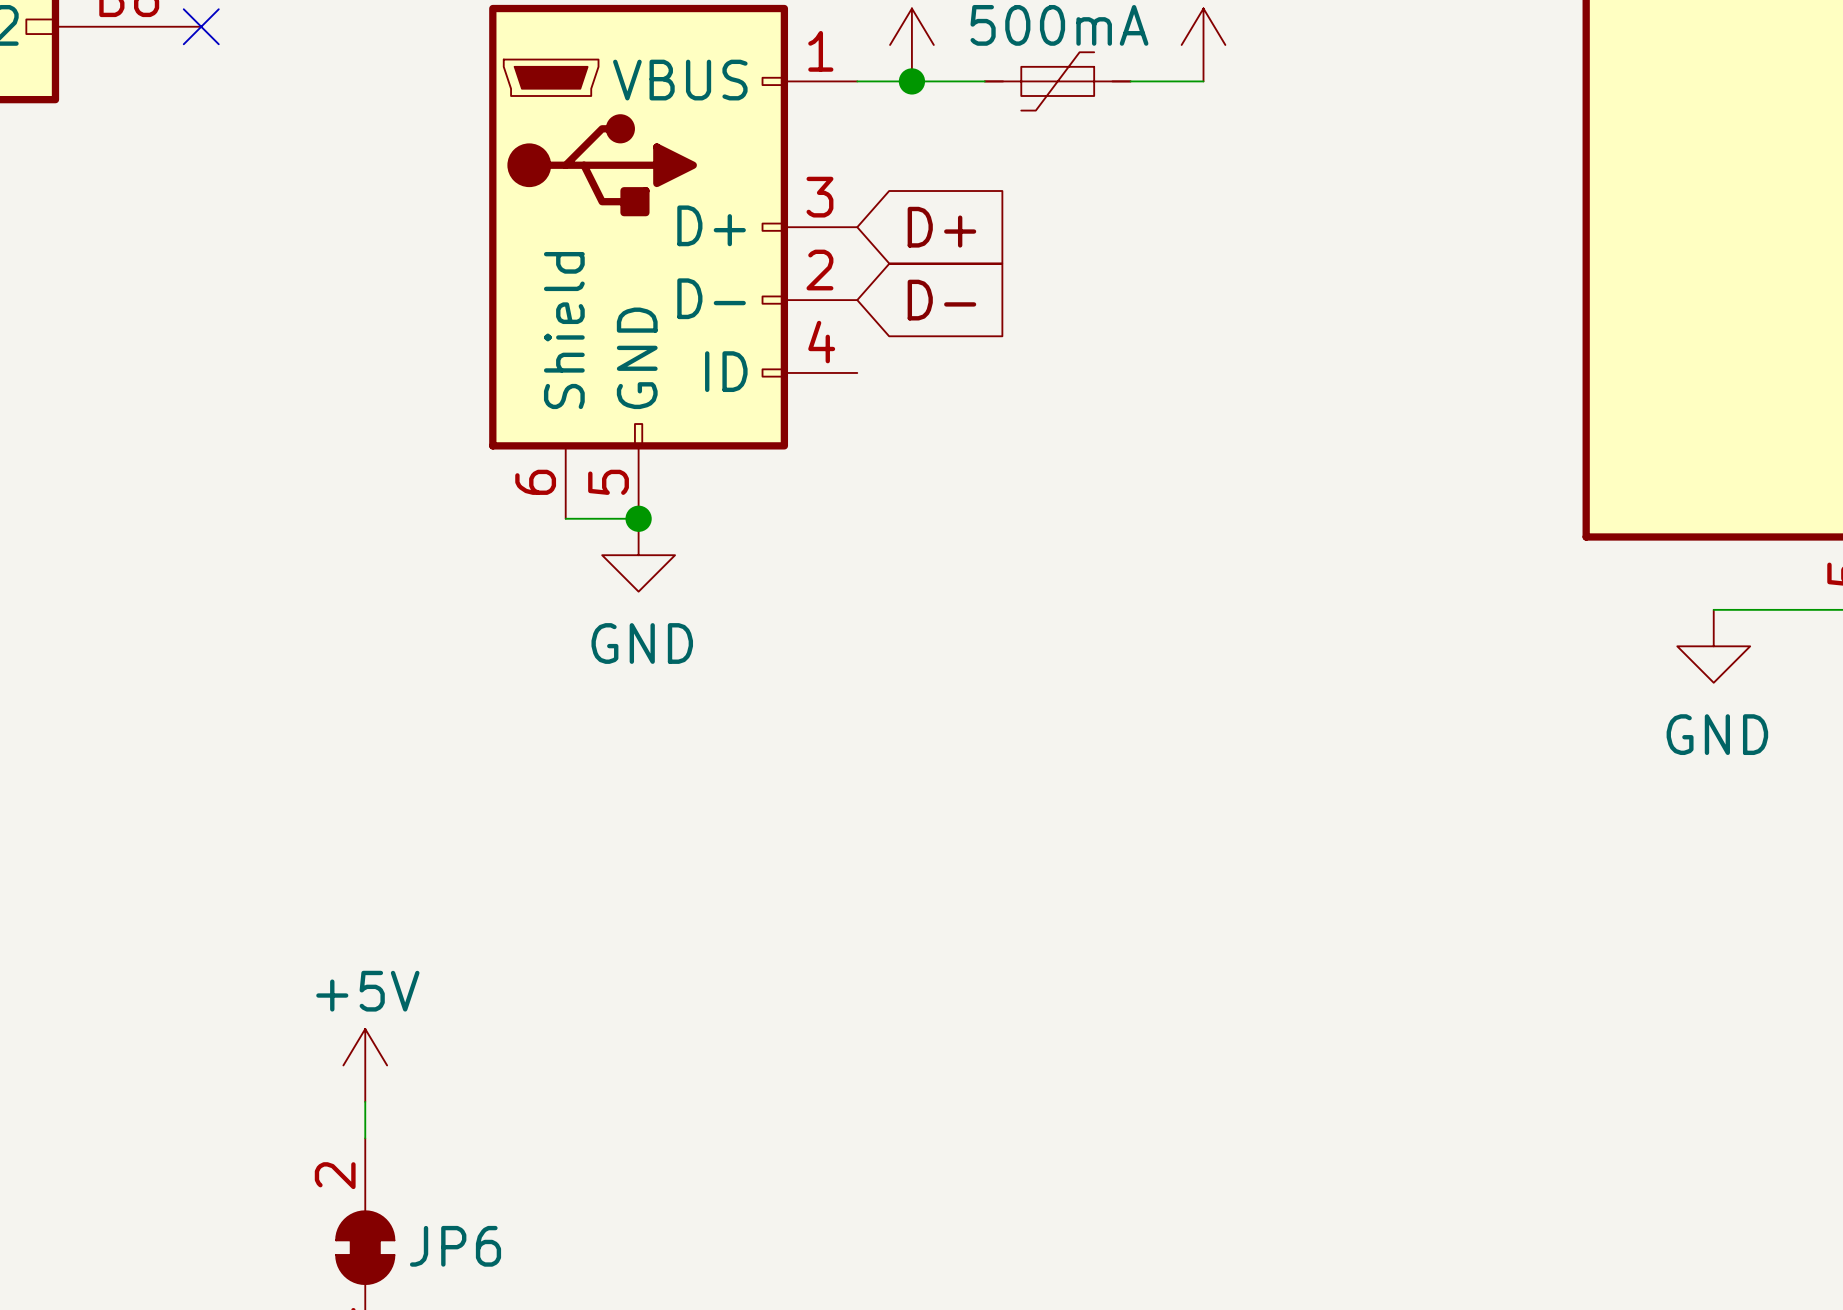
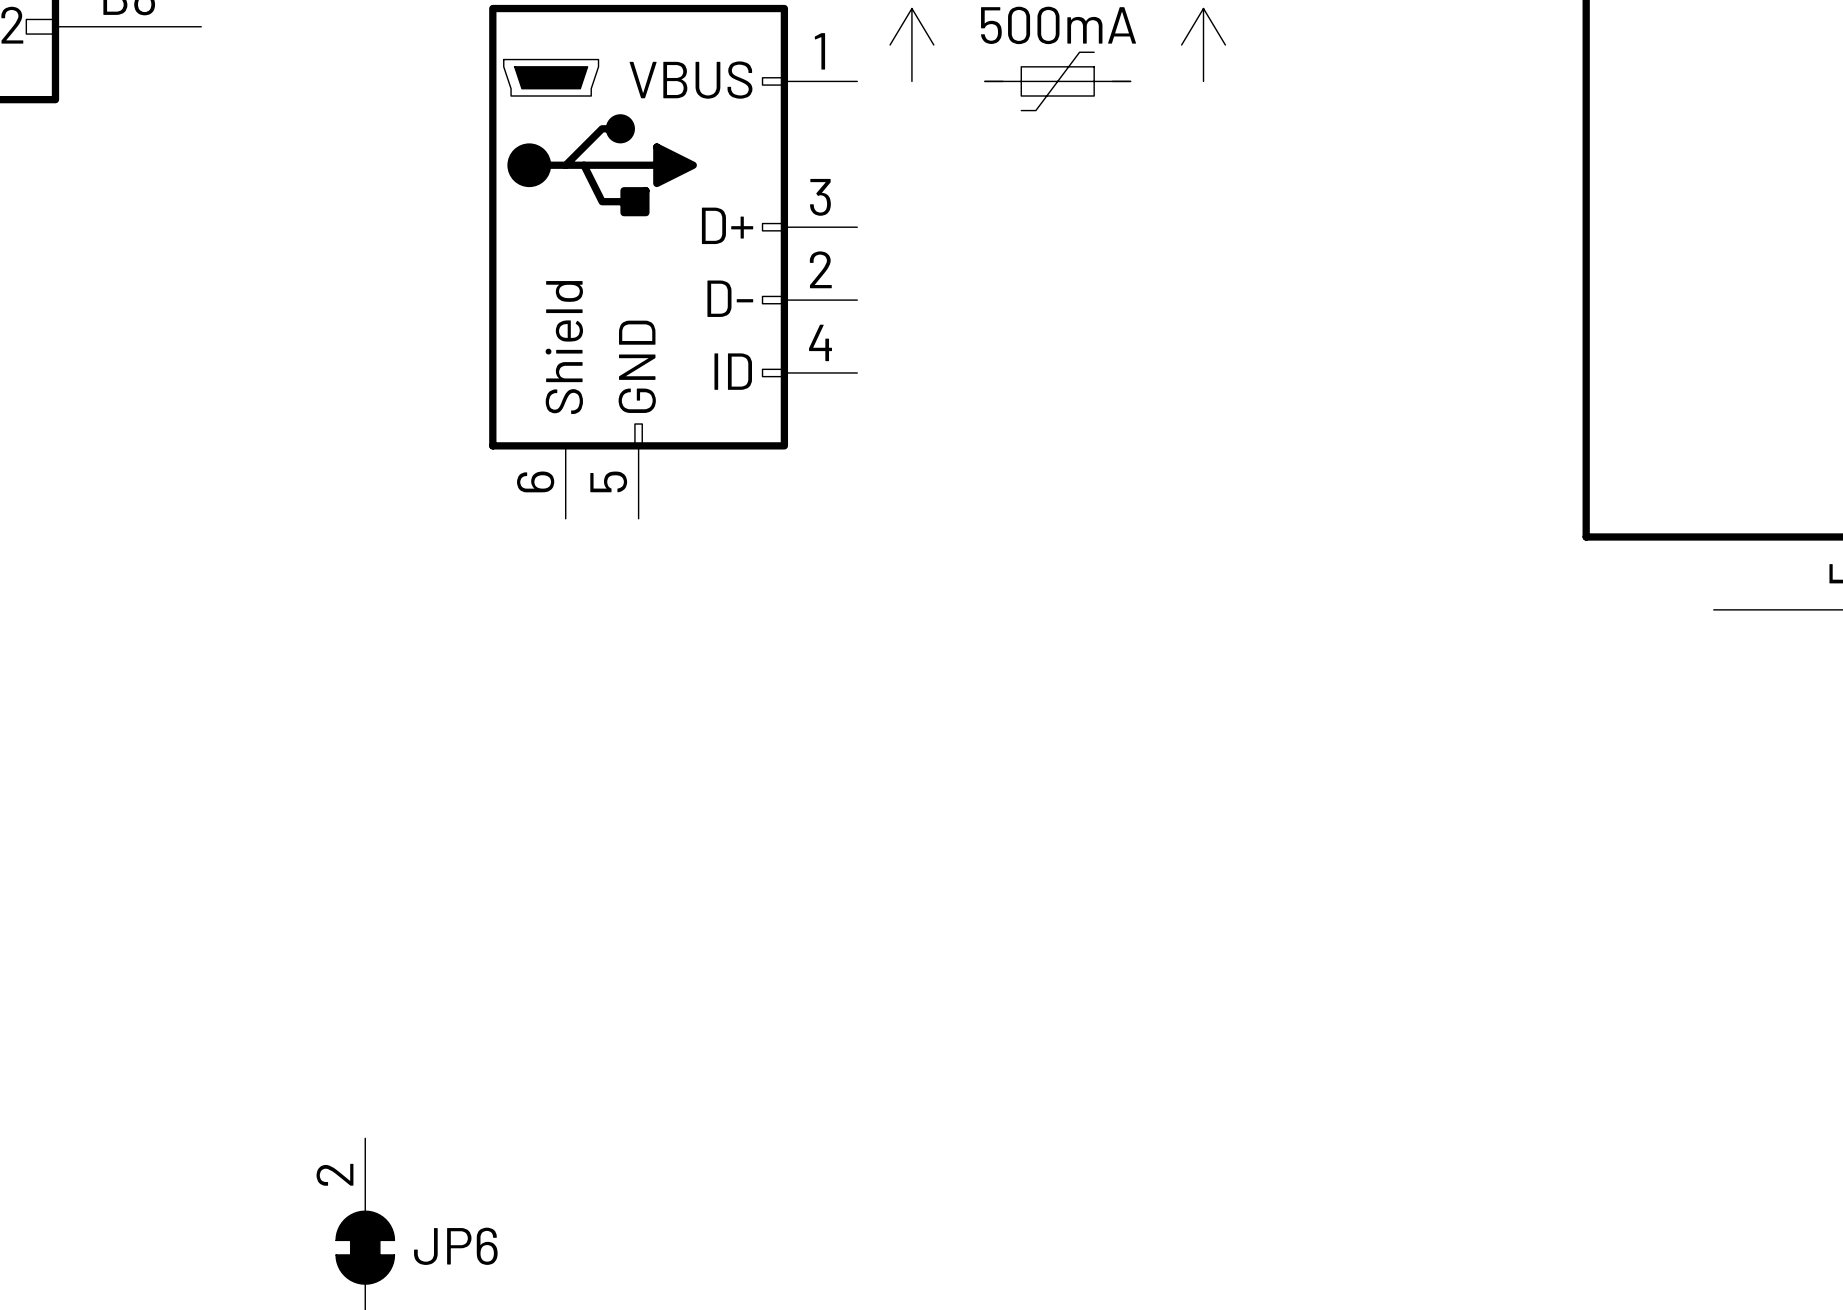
no-connect mark: (201, 26) -> none
wire: (857, 81) (984, 81) -> none
junction: (911, 81) -> none
wire: (1130, 81) (1203, 81) -> none
global label: D+ (941, 227) -> none
global label: D- (941, 300) -> none
wire: (565, 518) (638, 518) -> none
junction: (638, 518) -> none
power symbol: GND (638, 555) -> none
power symbol: GND (1713, 646) -> none
power symbol: +5V (365, 1065) -> none
wire: (365, 1101) (365, 1138) -> none

